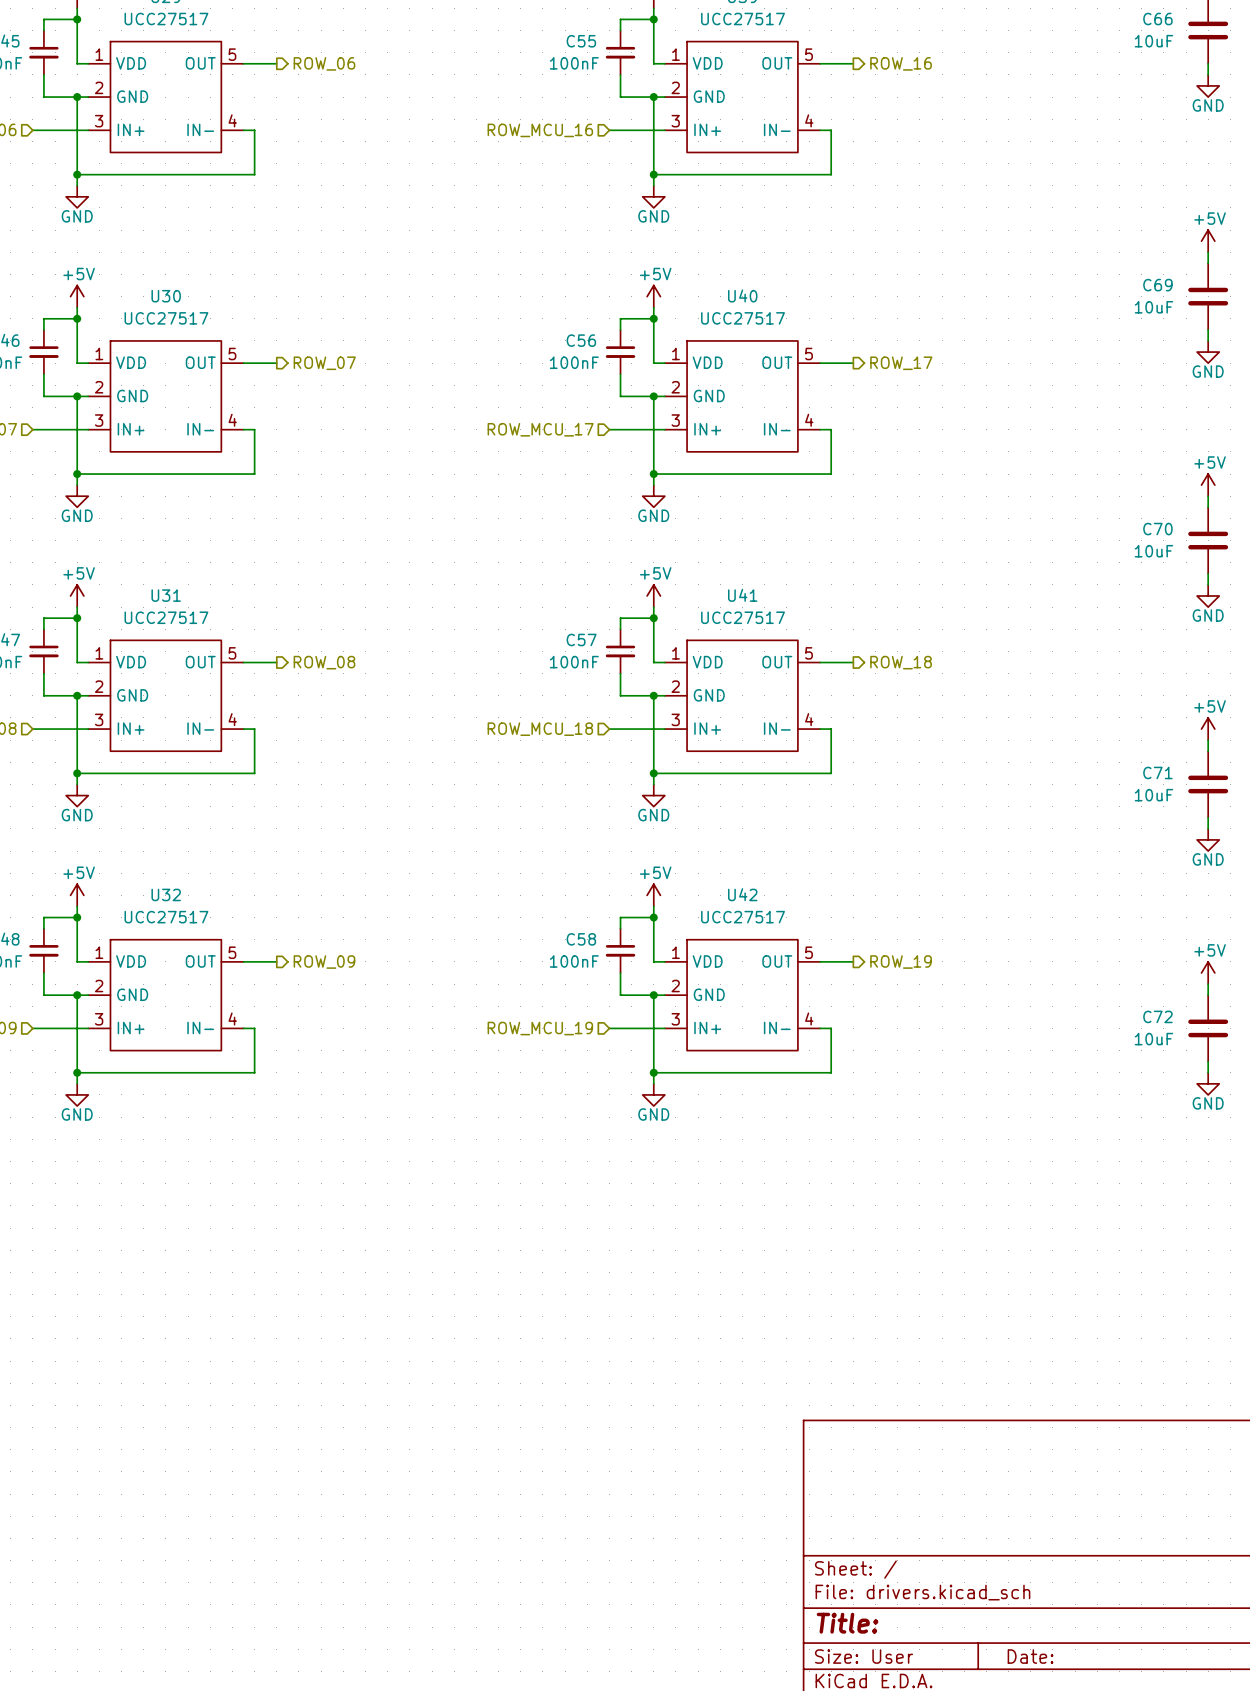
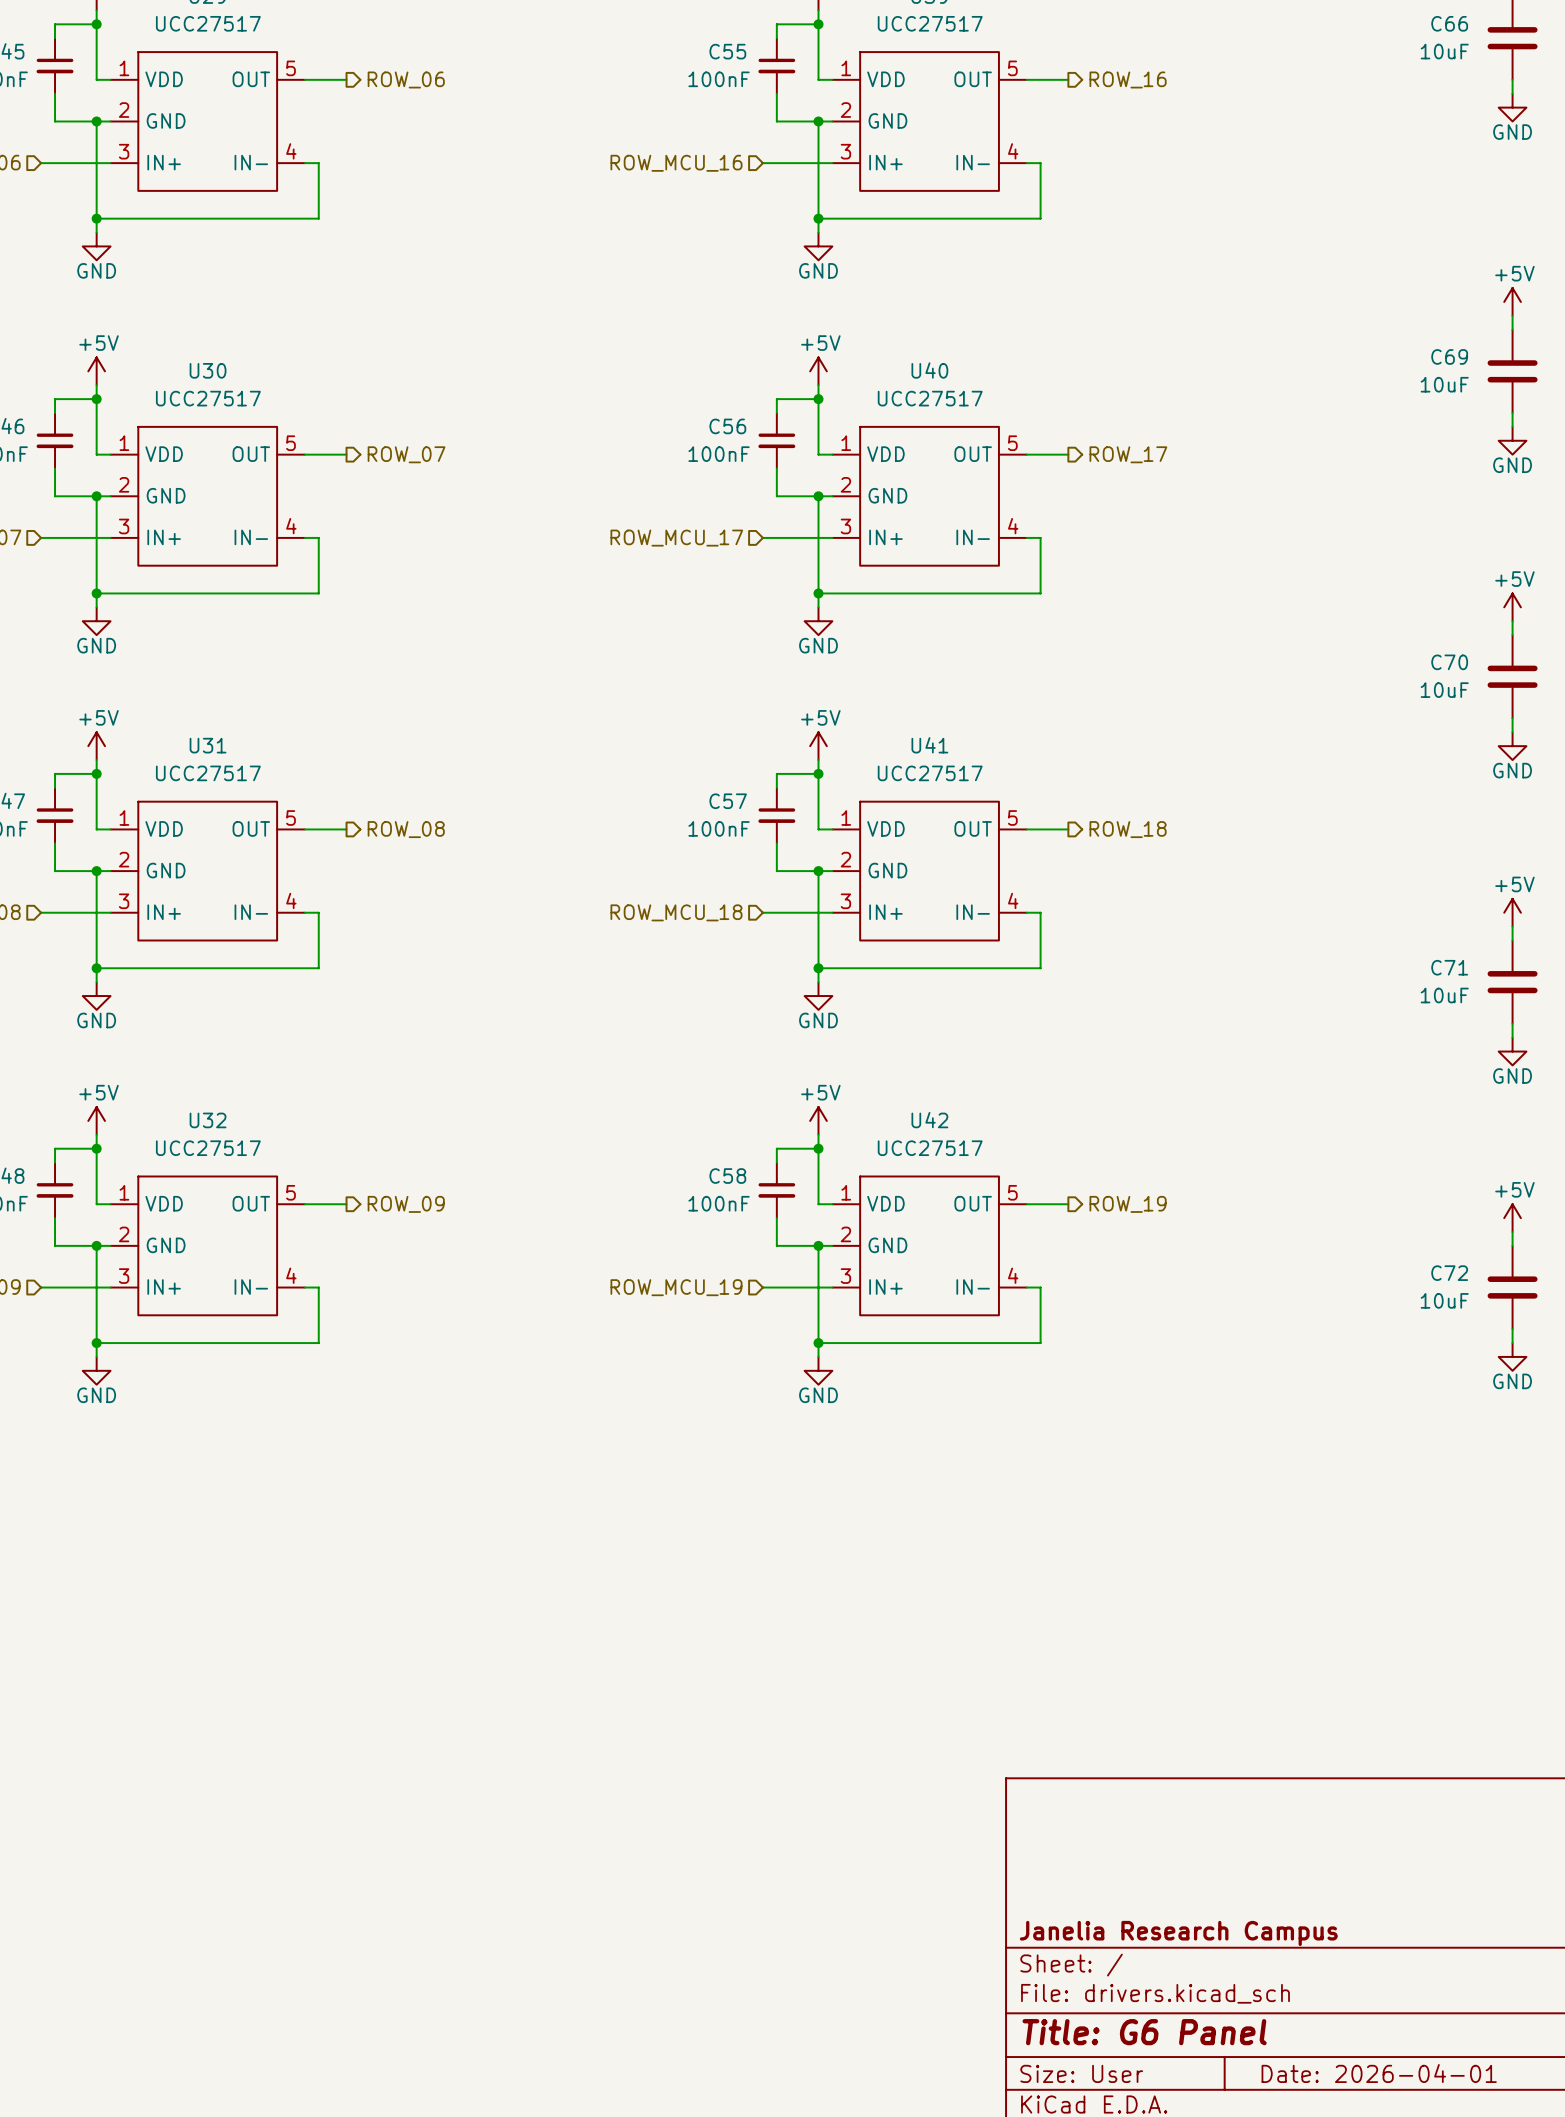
title block: none -> Janelia Research Campus (1178, 1933)
title block: Title: (847, 1623) -> Title: G6 Panel (1144, 2032)
title block: Date: (1030, 1656) -> Date: 2026-04-01 (1379, 2073)

